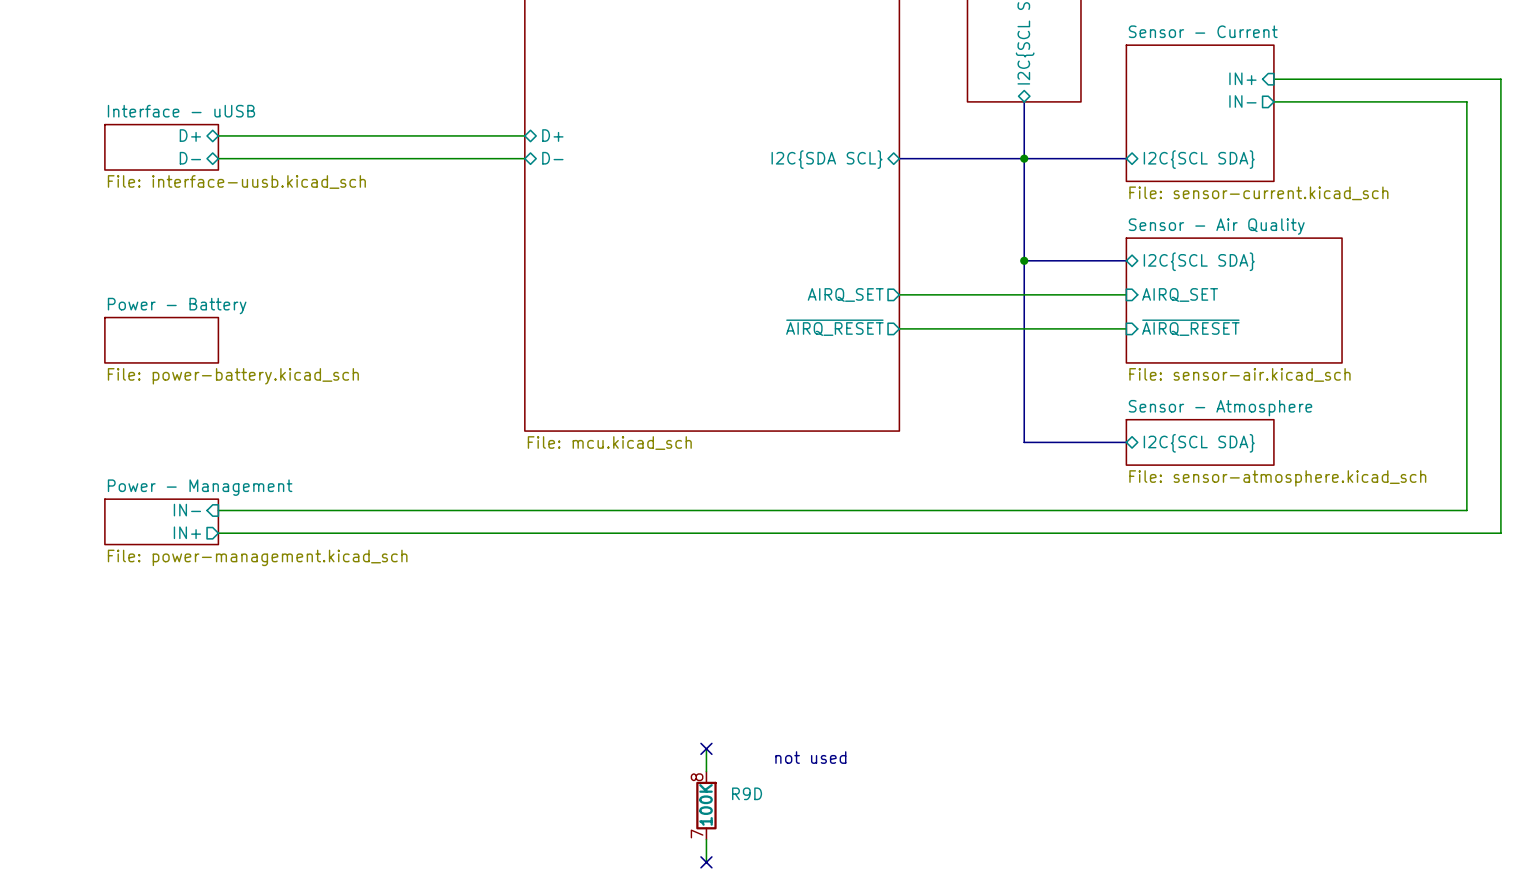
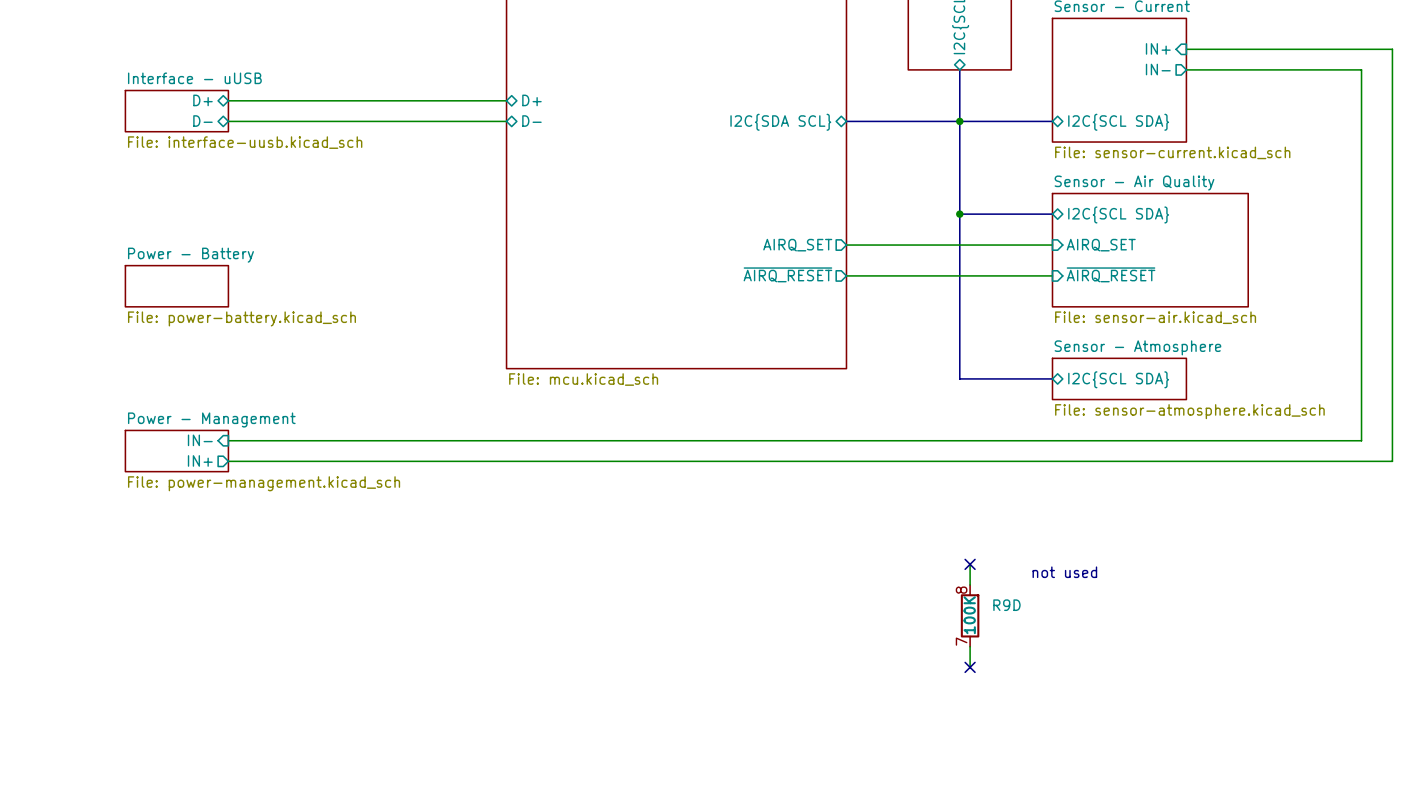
wire: none -> (970, 564) (970, 584)
no-connect mark: none -> (970, 564)
text: none -> not used (1064, 572)
wire: none -> (970, 646) (970, 667)
wire: (706, 748) (706, 771) -> none
no-connect mark: (706, 748) -> none
text: not used (810, 757) -> none
no-connect mark: none -> (970, 667)
R9D position: (706, 805) -> (970, 615)
wire: (706, 839) (706, 862) -> none
no-connect mark: (706, 862) -> none

